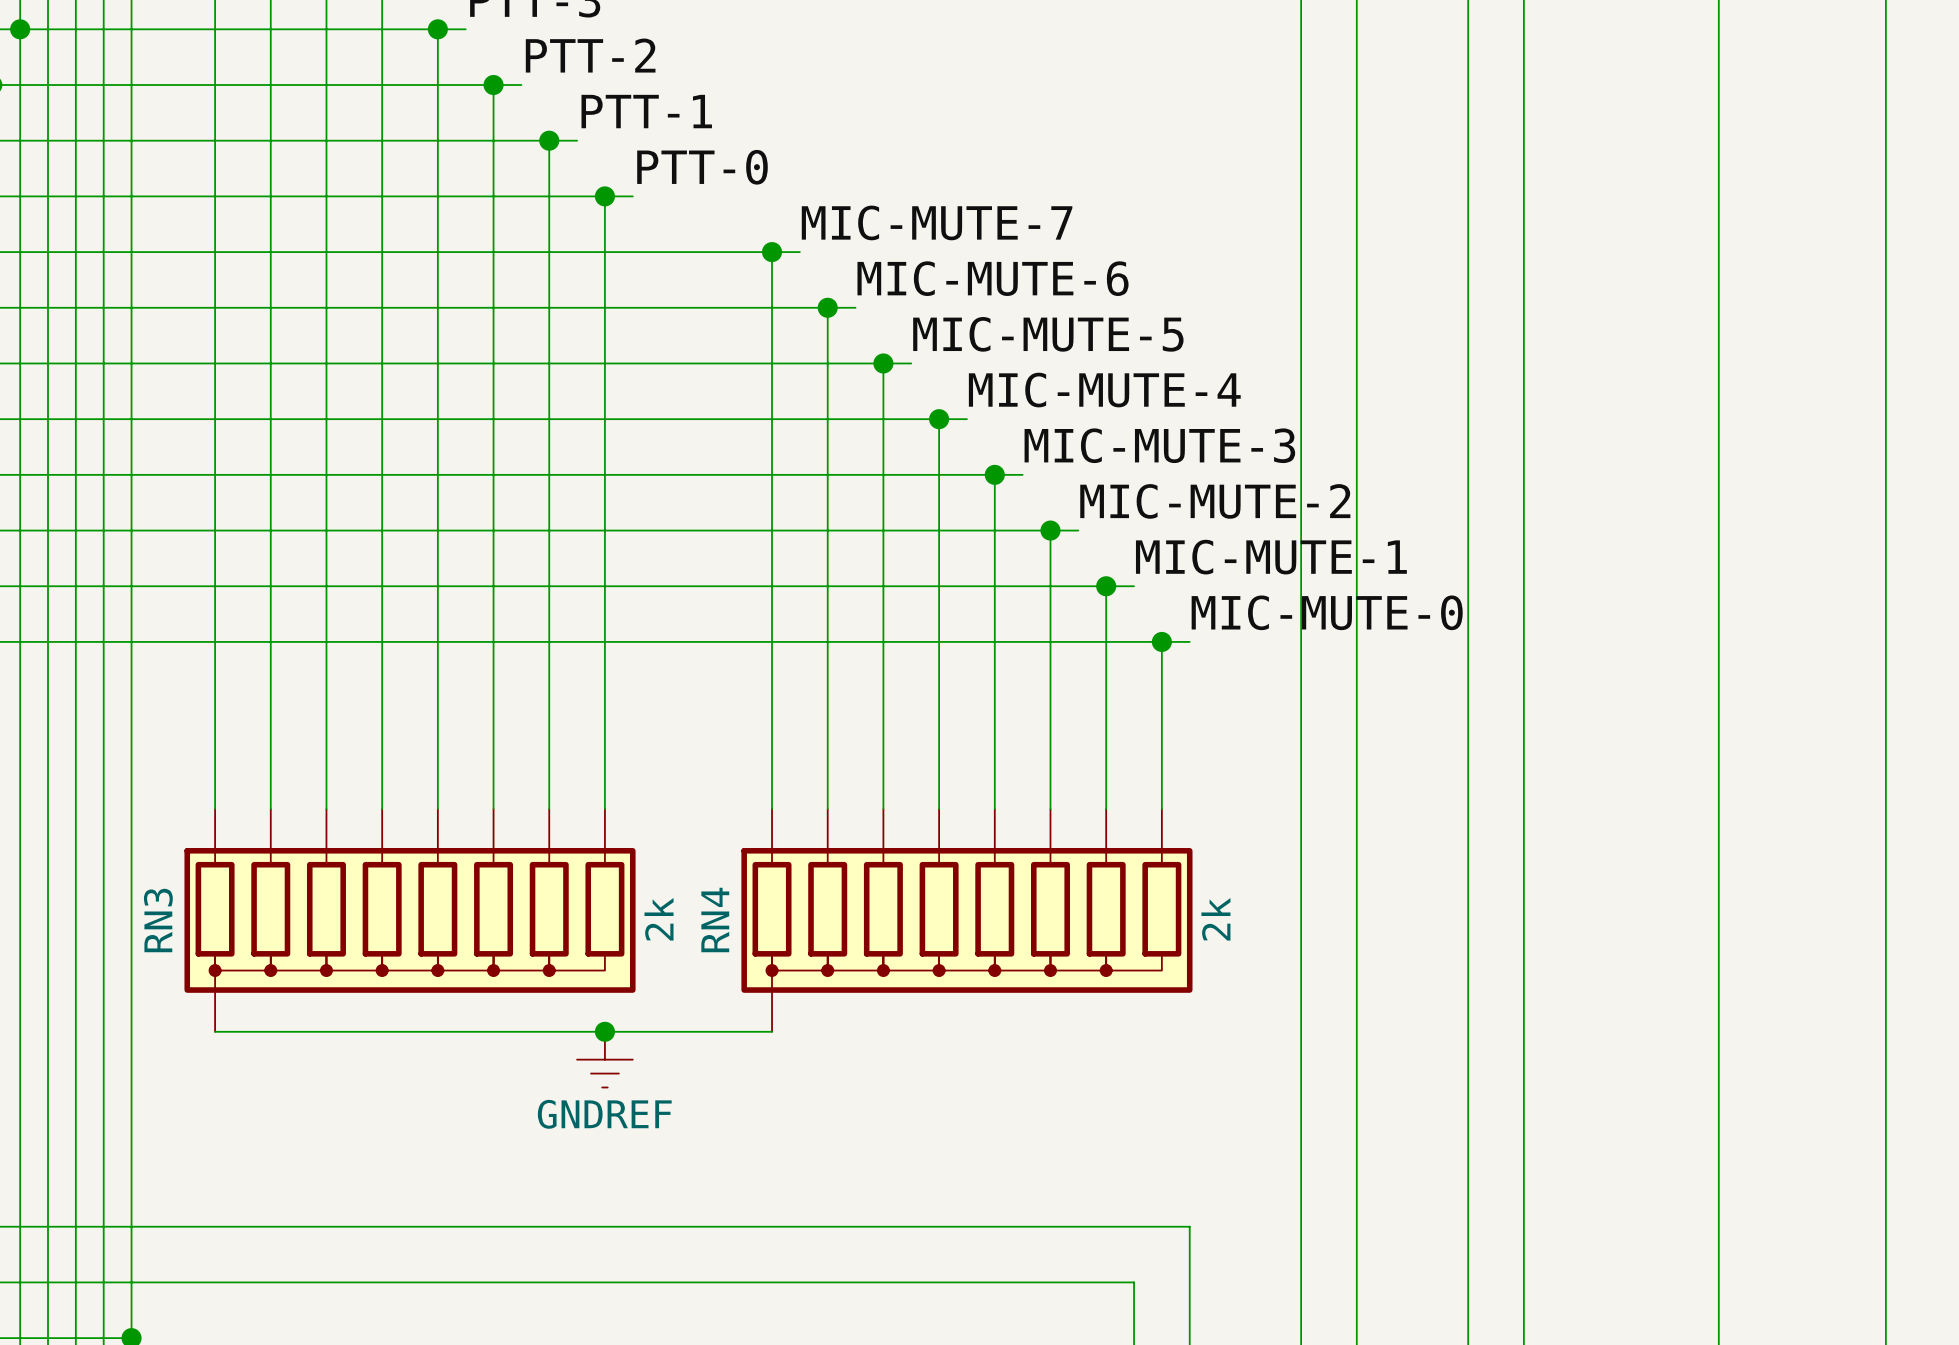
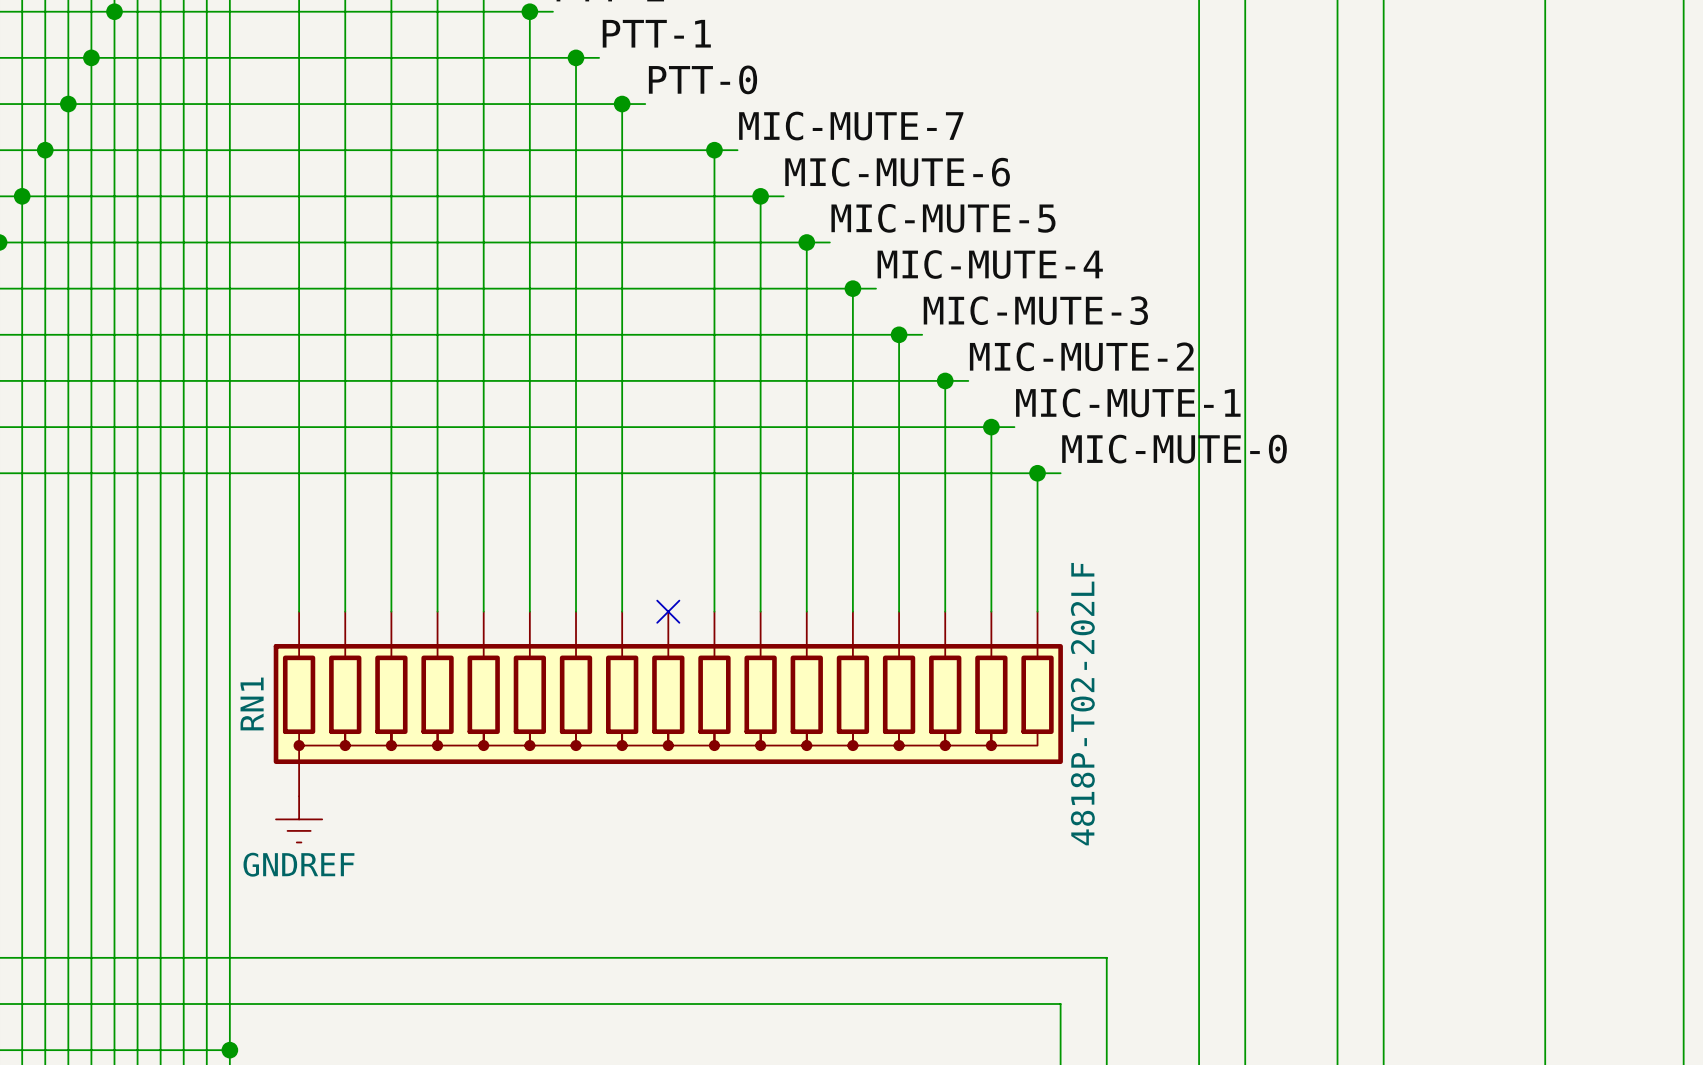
label position: MIC-MUTE-7 (937, 222) -> MIC-MUTE-7 (851, 126)
wire: none -> (714, 150) (714, 611)
junction: none -> (714, 150)
wire: (744, 252) (799, 252) -> none
wire: (772, 252) (772, 307) -> none
junction: (772, 252) -> none
label position: MIC-MUTE-6 (993, 278) -> MIC-MUTE-6 (897, 172)
junction: none -> (760, 196)
wire: (799, 307) (855, 307) -> none
wire: (827, 307) (827, 363) -> none
junction: (827, 307) -> none
label position: MIC-MUTE-5 (1048, 334) -> MIC-MUTE-5 (943, 218)
junction: none -> (806, 242)
wire: (855, 363) (911, 363) -> none
wire: (883, 363) (883, 419) -> none
junction: (883, 363) -> none
label position: MIC-MUTE-4 (1104, 390) -> MIC-MUTE-4 (990, 264)
junction: none -> (852, 288)
wire: (911, 419) (966, 419) -> none
wire: (939, 419) (939, 474) -> none
junction: (939, 419) -> none
label position: MIC-MUTE-3 (1159, 445) -> MIC-MUTE-3 (1035, 310)
junction: none -> (899, 334)
wire: (966, 474) (1022, 474) -> none
wire: (994, 474) (994, 530) -> none
junction: (994, 474) -> none
label position: MIC-MUTE-2 (1215, 501) -> MIC-MUTE-2 (1081, 356)
junction: none -> (945, 380)
wire: (1022, 530) (1078, 530) -> none
wire: (1050, 530) (1050, 586) -> none
junction: (1050, 530) -> none
label position: MIC-MUTE-1 (1271, 557) -> MIC-MUTE-1 (1128, 402)
junction: none -> (991, 427)
wire: (1078, 586) (1134, 586) -> none
wire: (1106, 586) (1106, 641) -> none
junction: (1106, 586) -> none
label position: MIC-MUTE-0 (1327, 612) -> MIC-MUTE-0 (1174, 449)
junction: none -> (1037, 473)
wire: (1134, 641) (1189, 641) -> none
wire: (1161, 641) (1161, 809) -> none
junction: (1161, 641) -> none
no-connect mark: none -> (668, 611)
RN3: 2k (410, 920) -> none
RN1: none -> 4818P-T02-202LF (668, 704)
RN4: 2k (966, 920) -> none
wire: (215, 1031) (772, 1031) -> none
junction: (604, 1031) -> none
power symbol position: GNDREF (604, 1059) -> GNDREF (299, 819)

